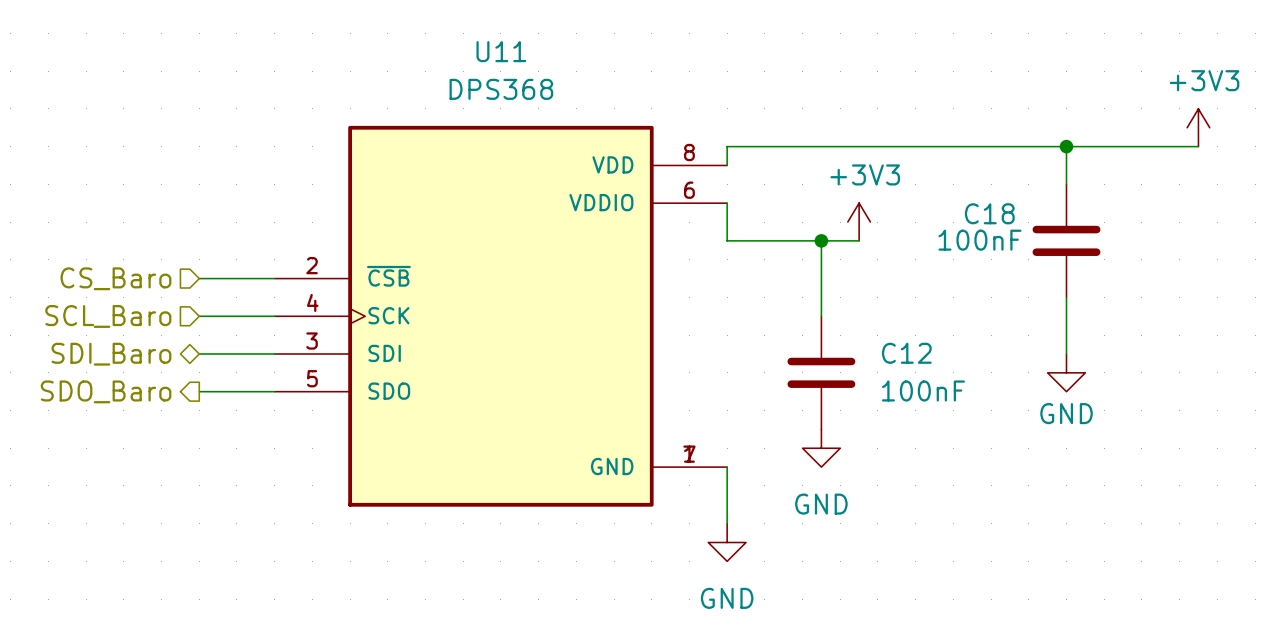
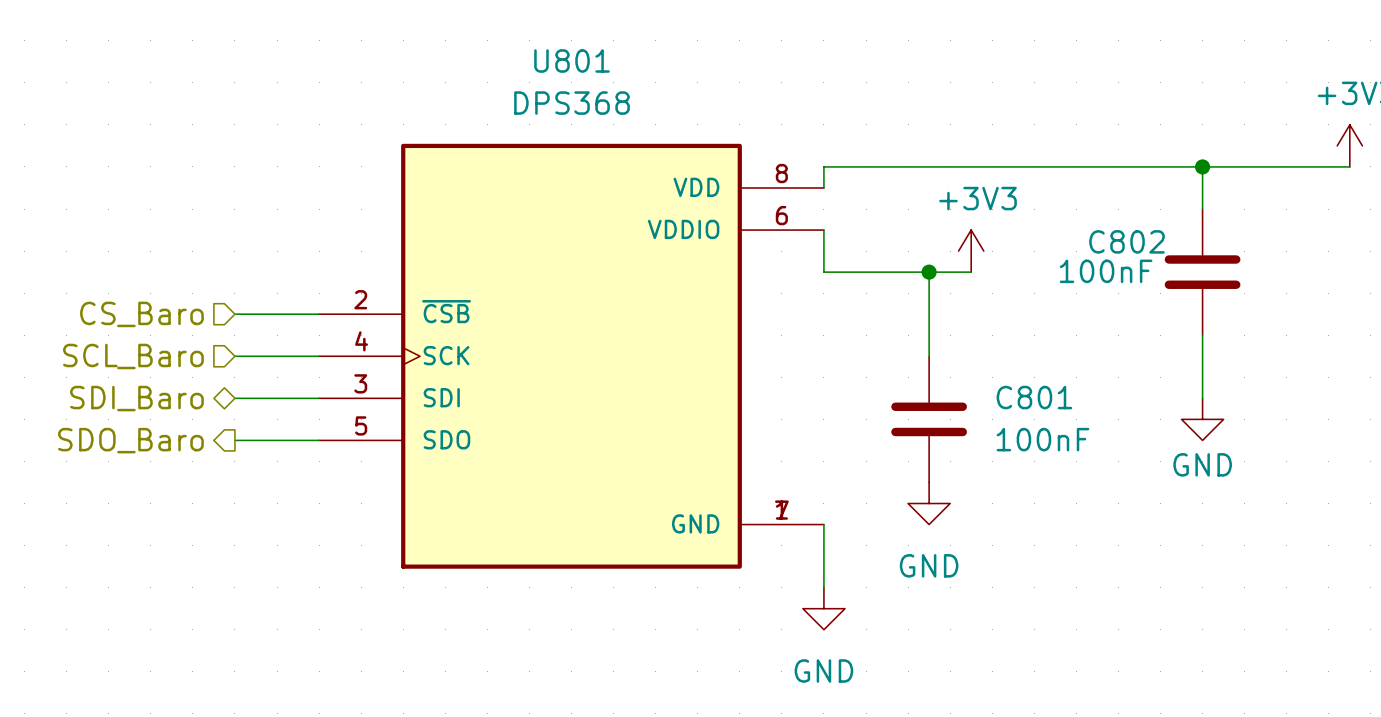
U11 name: U11 (501, 51) -> U801 (572, 60)
C18 name: C18 (989, 213) -> C802 (1127, 241)
C12 name: C12 (906, 353) -> C801 (1034, 397)

